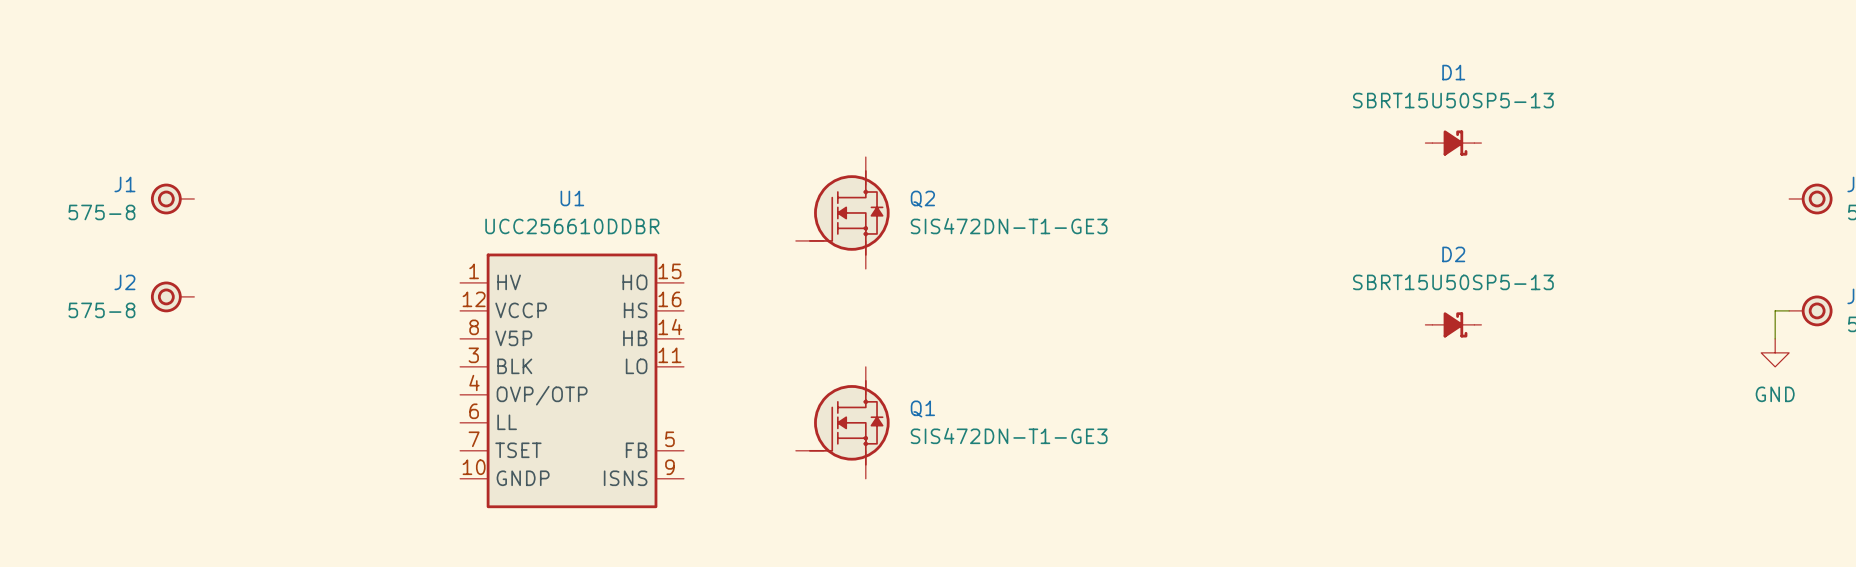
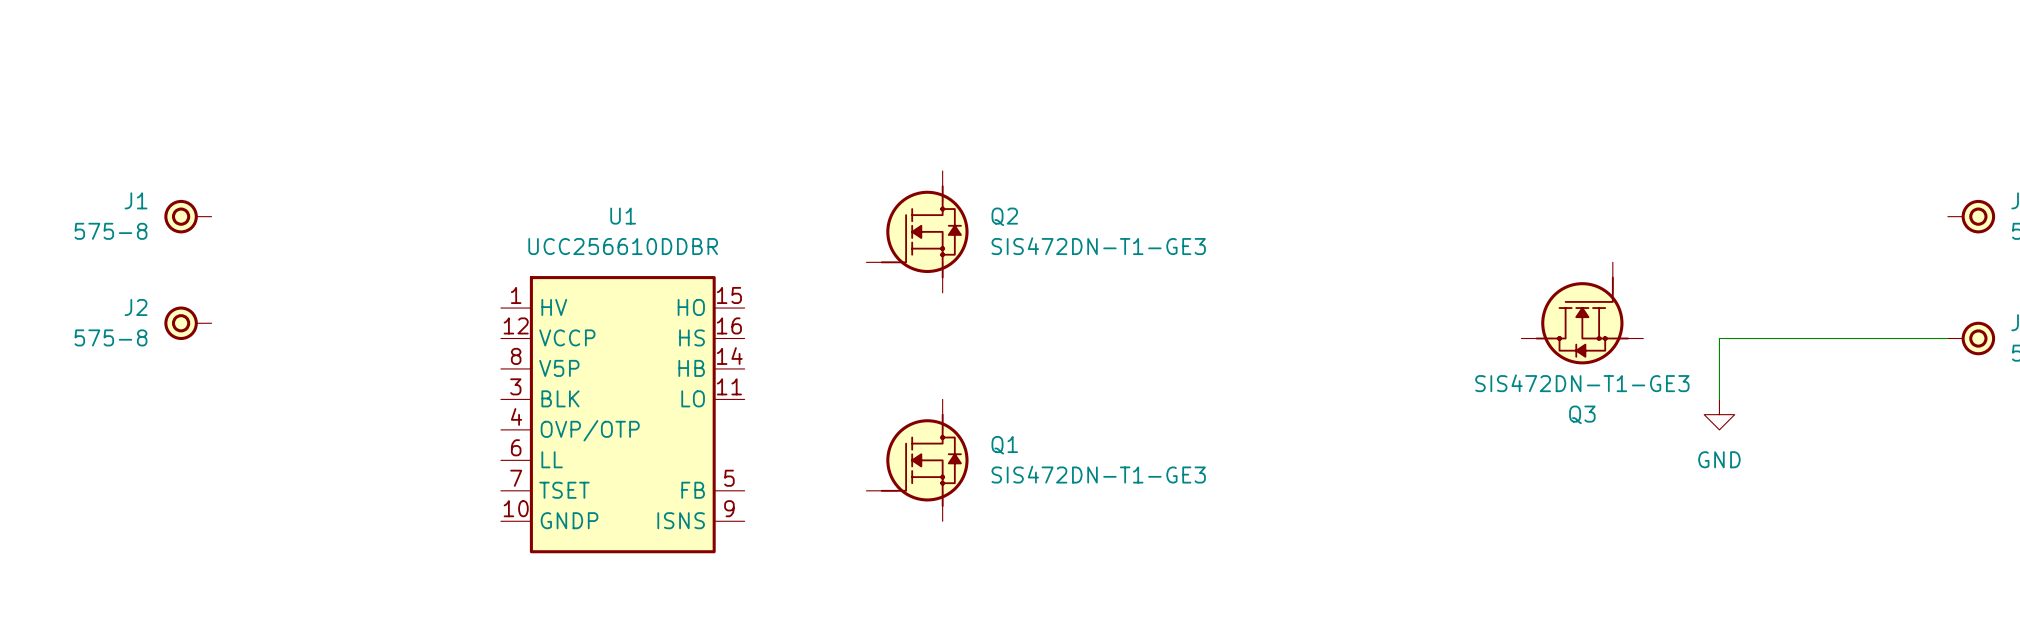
D1: (1453, 143) -> none
Q3: none -> (1582, 313)
wire: (1775, 310) (1775, 338) -> (1932, 338) (1719, 338) (1719, 399)
D2: (1453, 324) -> none
power symbol position: GND (1775, 352) -> GND (1719, 414)

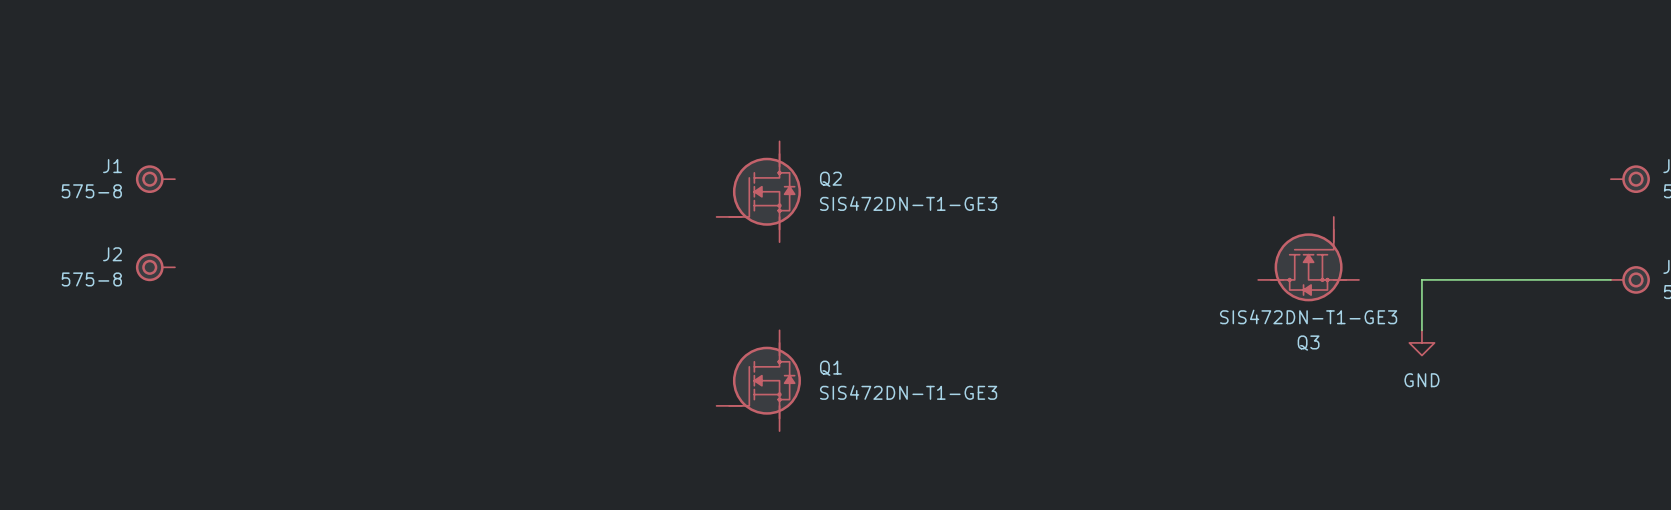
U1: (622, 414) -> none

